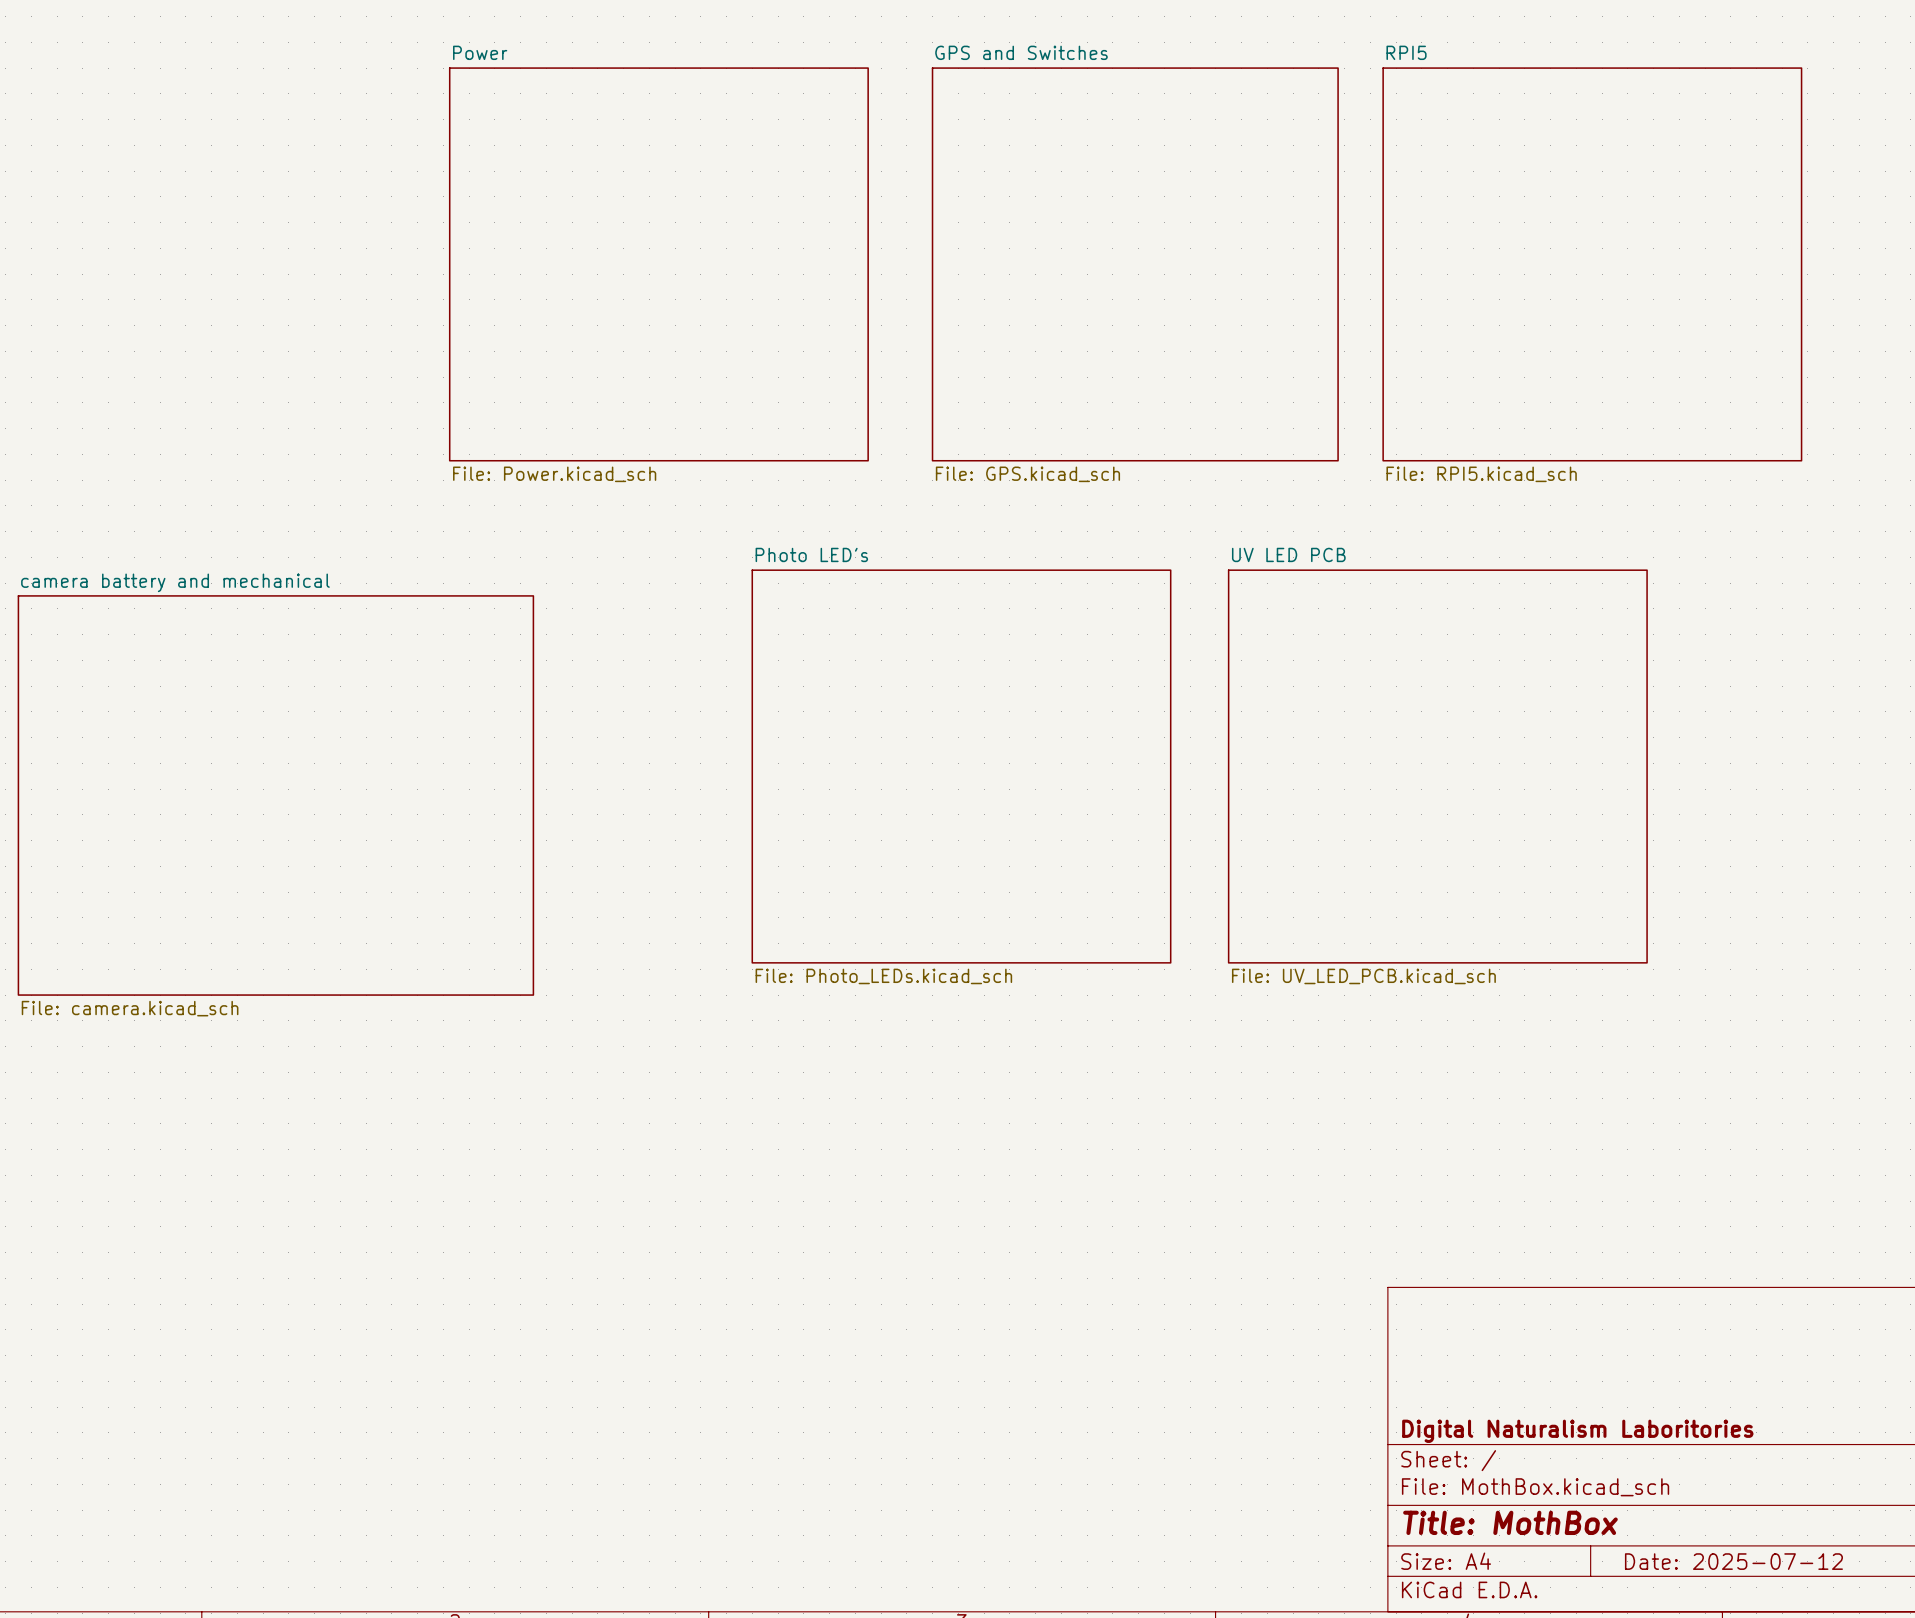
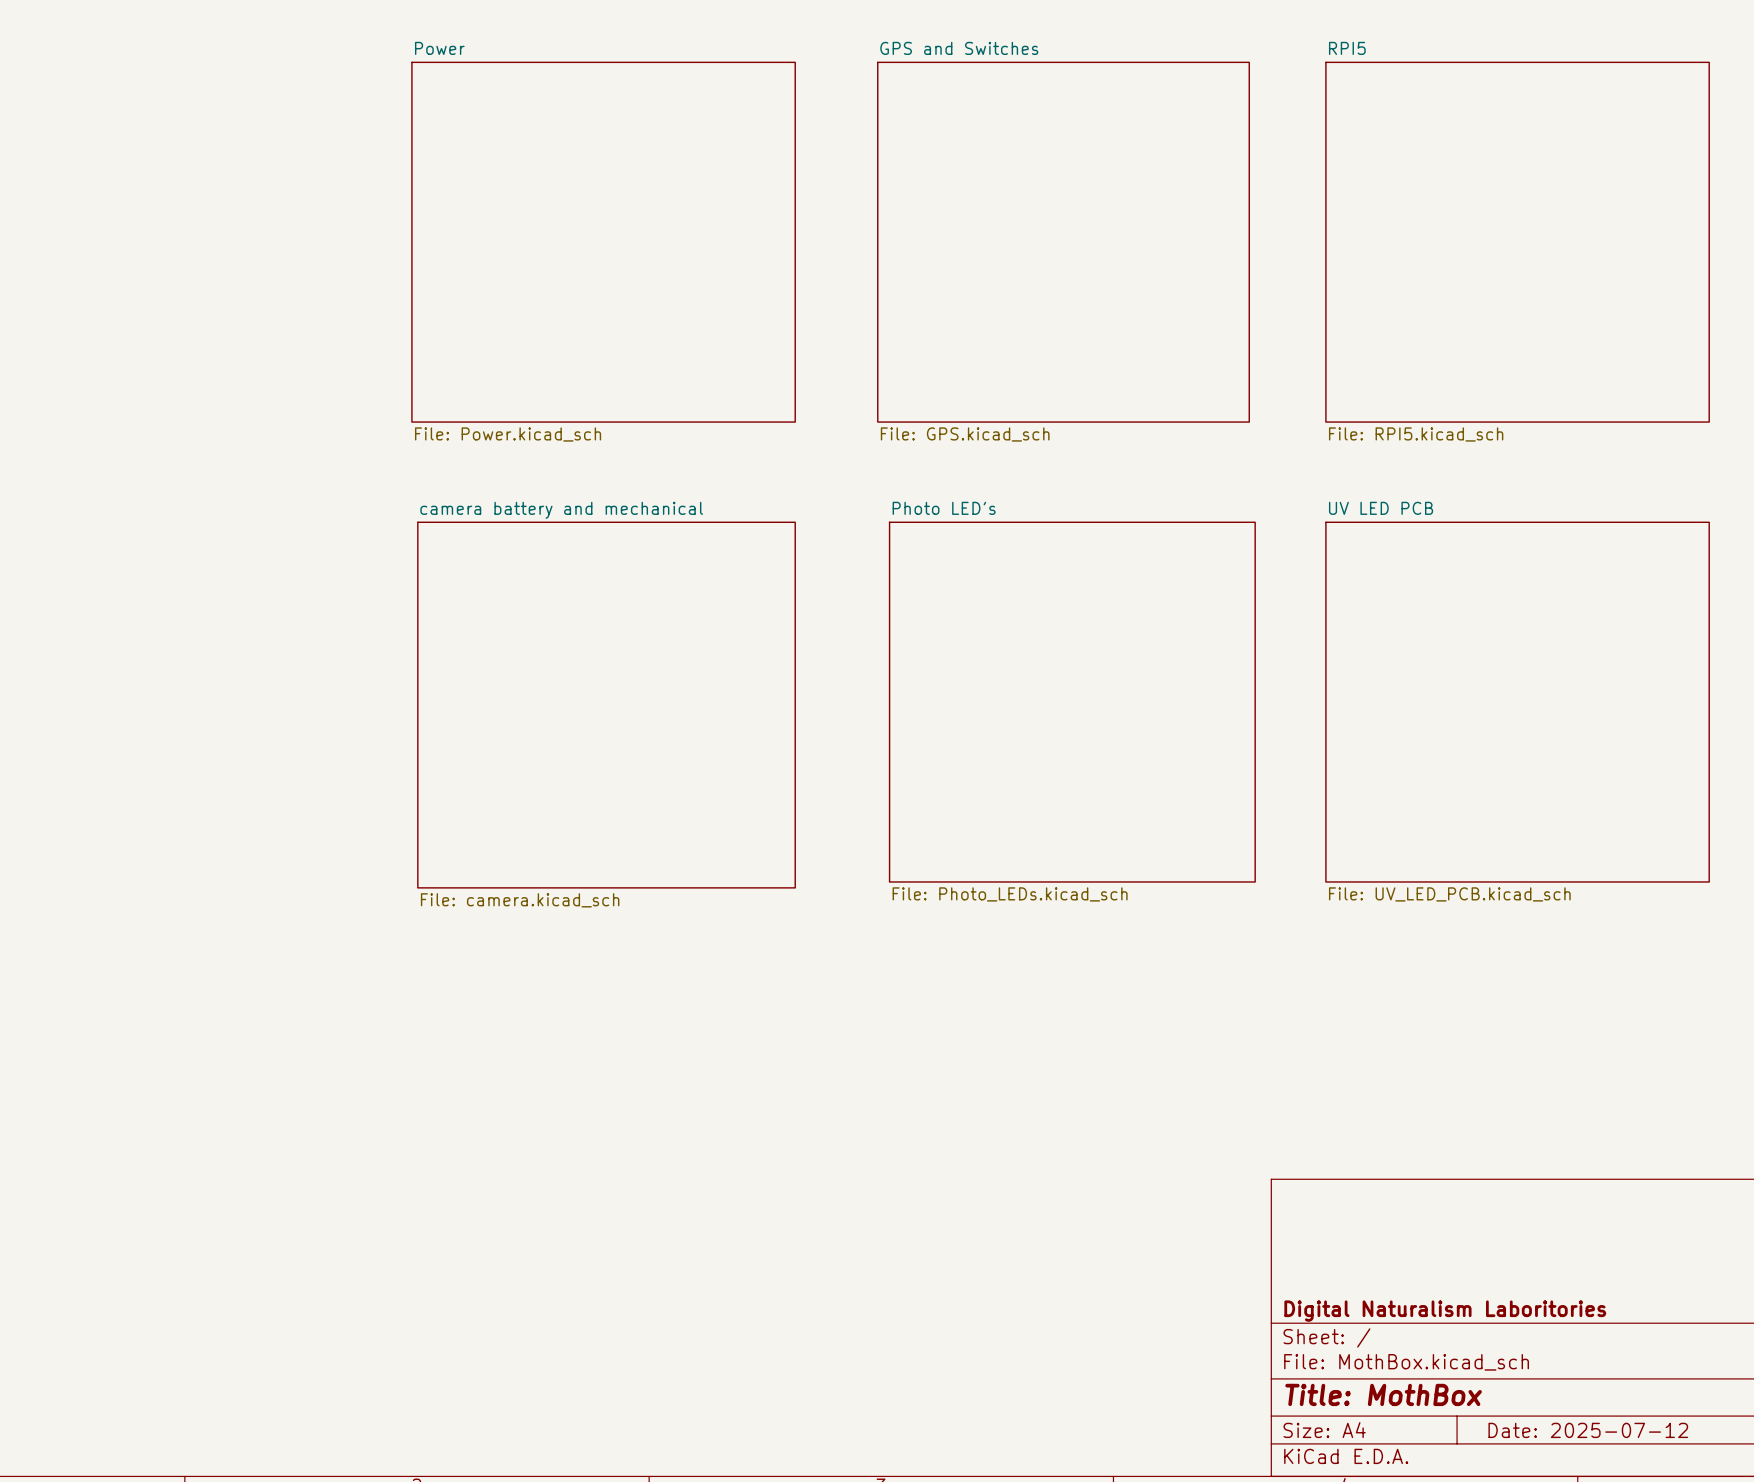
sheet GPS and Switches position: (1135, 264) -> (1063, 242)
sheet RPI5 position: (1592, 264) -> (1517, 242)
sheet Photo LED's: File: Photo_LEDs.kicad_sch (961, 766) -> none
sheet Photo LED's: none -> File: Photo_LEDs.kicad_sch (1072, 702)
sheet UV LED PCB position: (1437, 766) -> (1517, 702)
sheet camera battery and mechanical: none -> File: camera.kicad_sch (606, 705)
sheet camera battery and mechanical: File: camera.kicad_sch (275, 795) -> none

